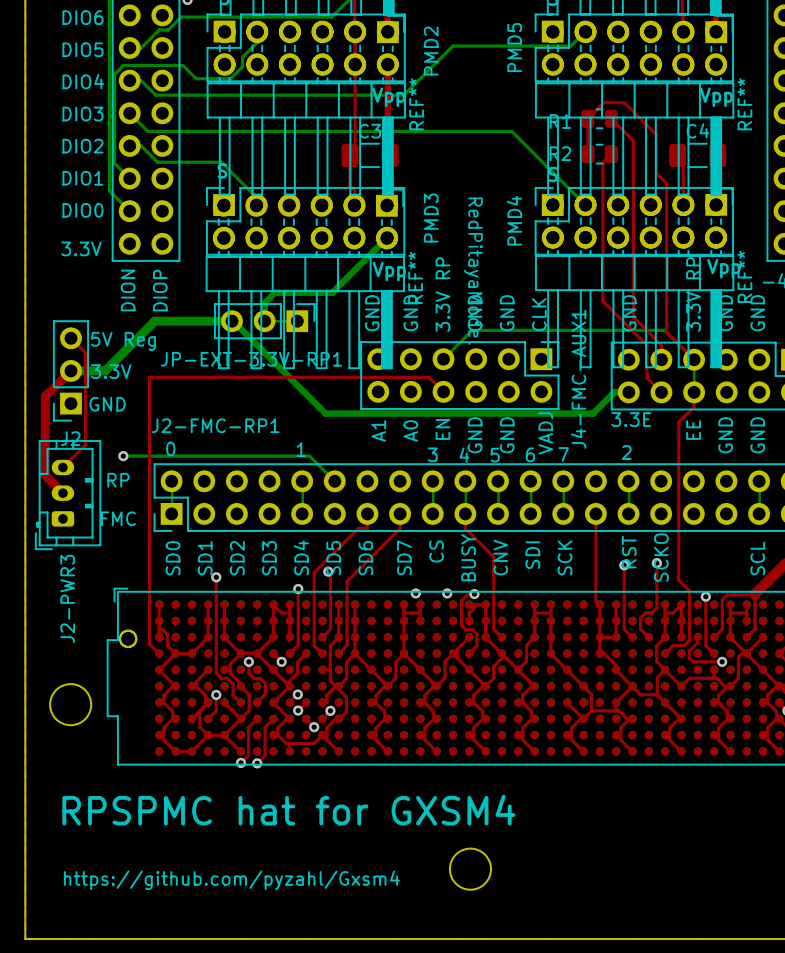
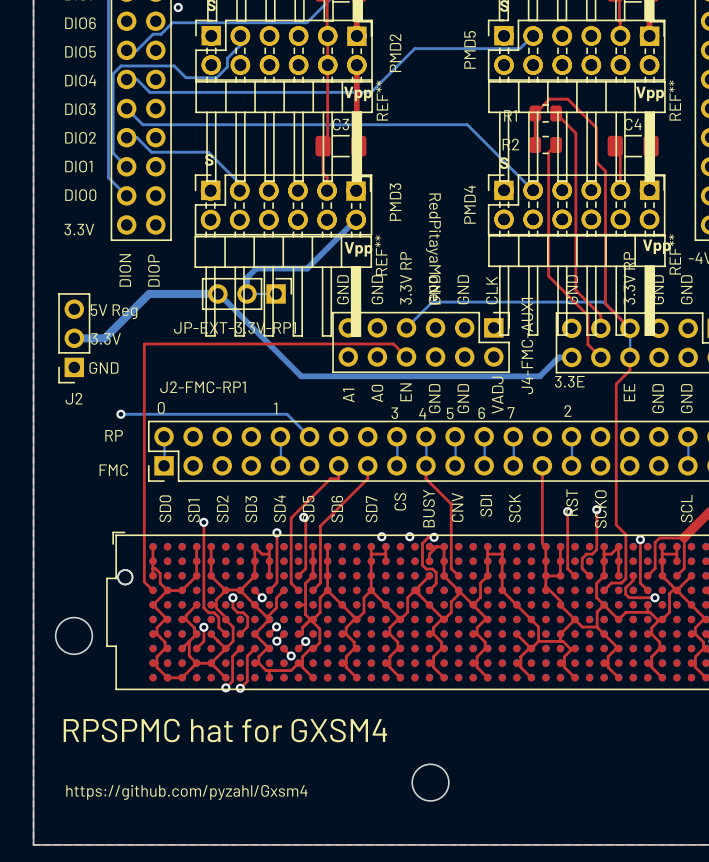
top track: (70, 338) (85, 352) (85, 444) (62, 467) -> none
top track: (70, 370) (45, 396) (45, 475) (62, 493) -> none
J2-PWR3: (68, 495) -> none

